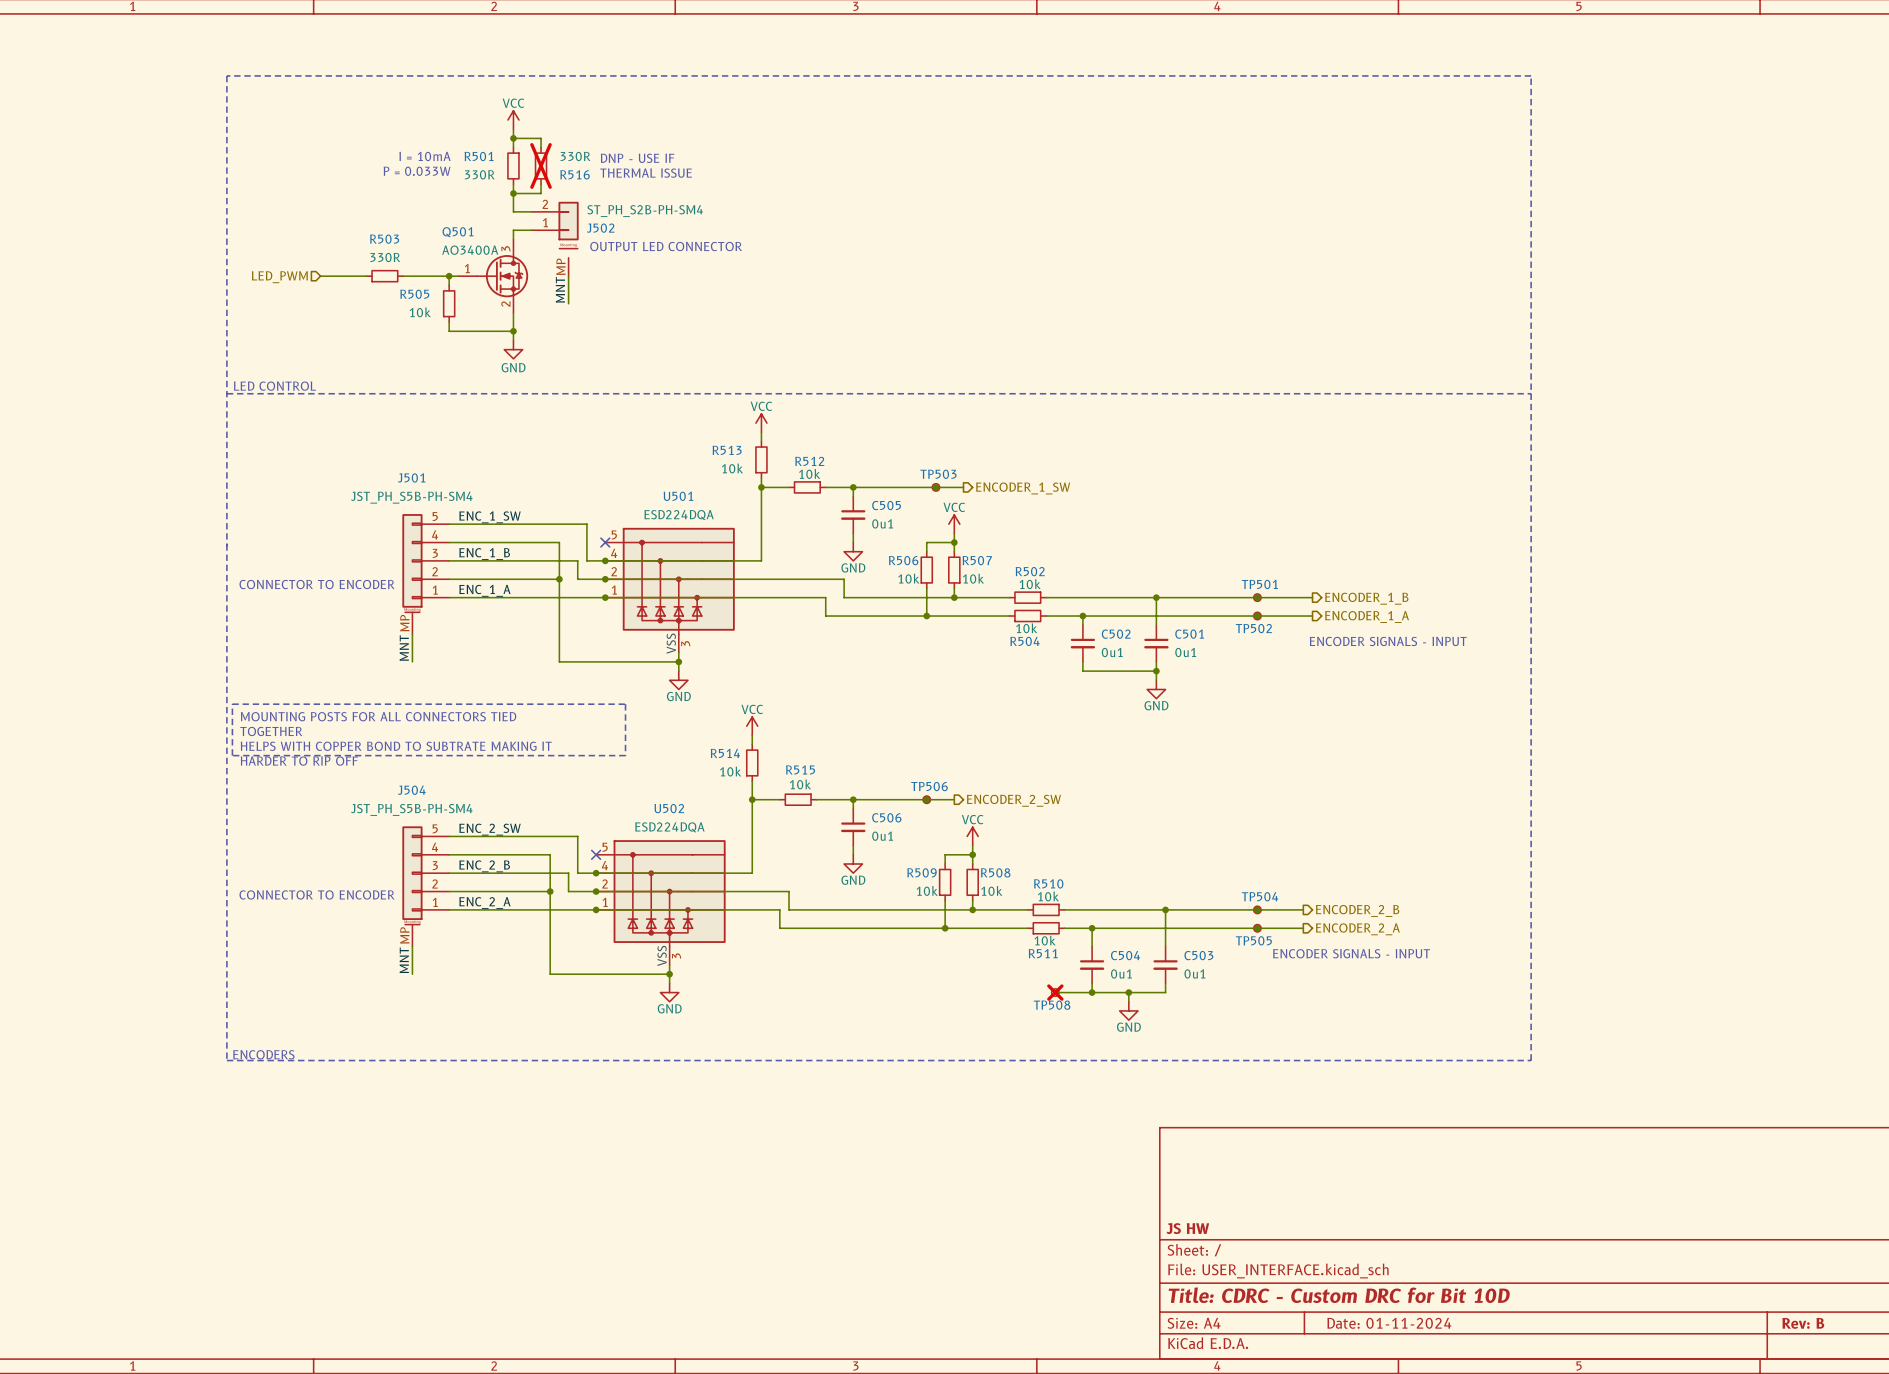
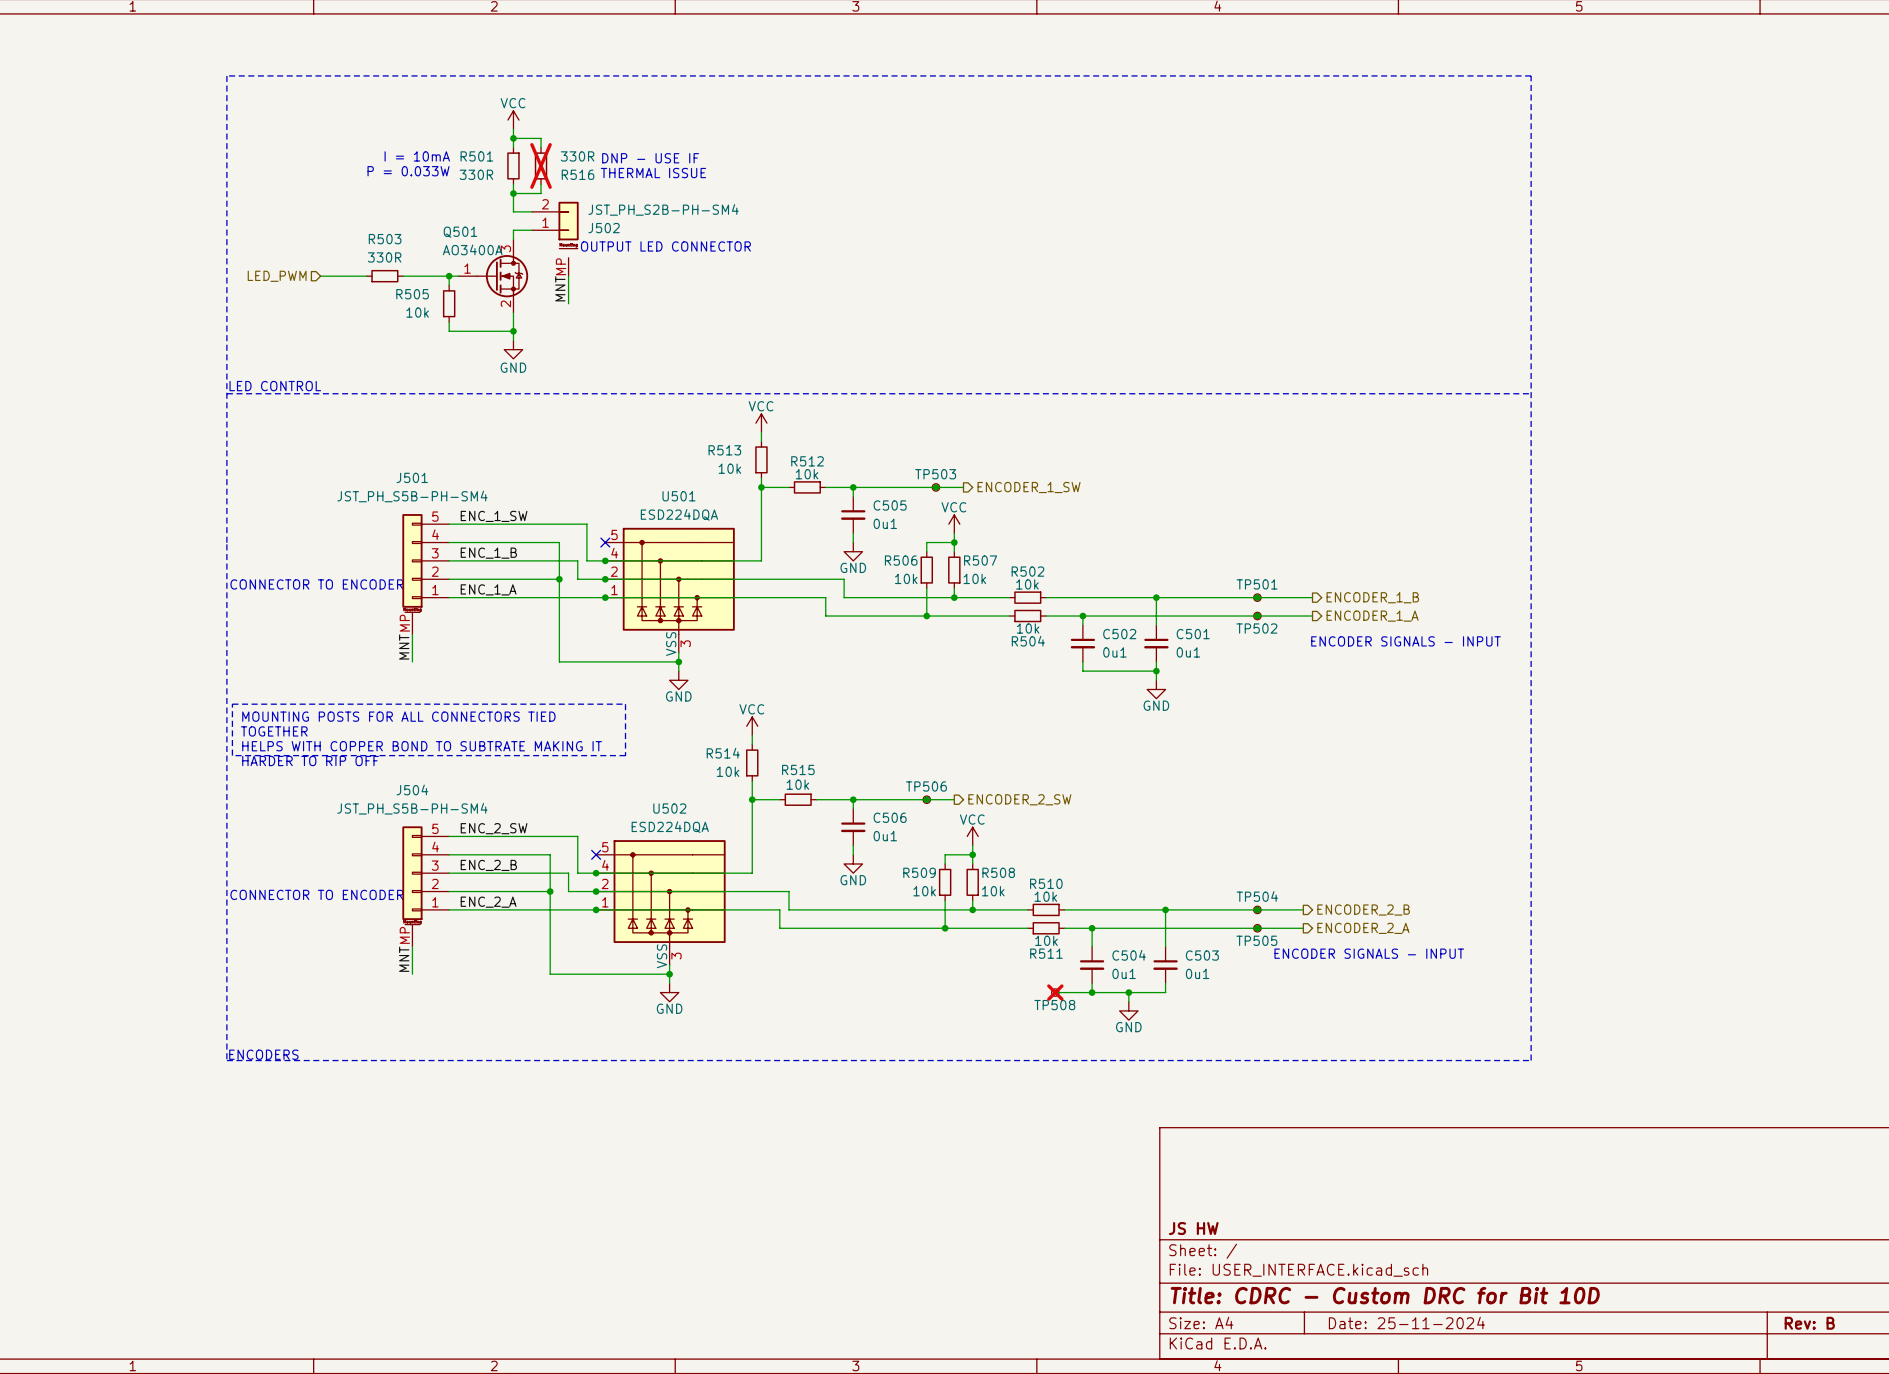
J502 value: ST_PH_S2B-PH-SM4 (645, 211) -> JST_PH_S2B-PH-SM4 (663, 209)
title block: Date: 01-11-2024 (1389, 1323) -> Date: 25-11-2024 (1406, 1322)

